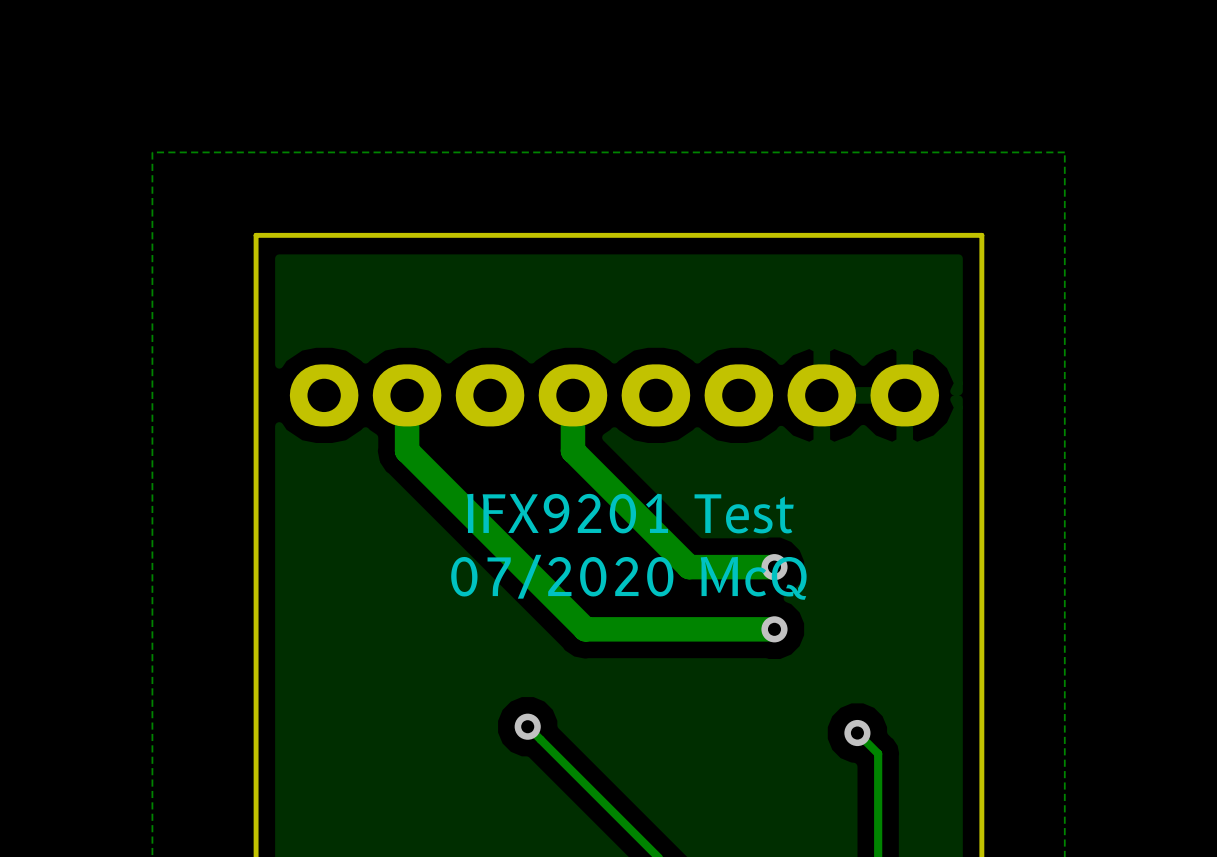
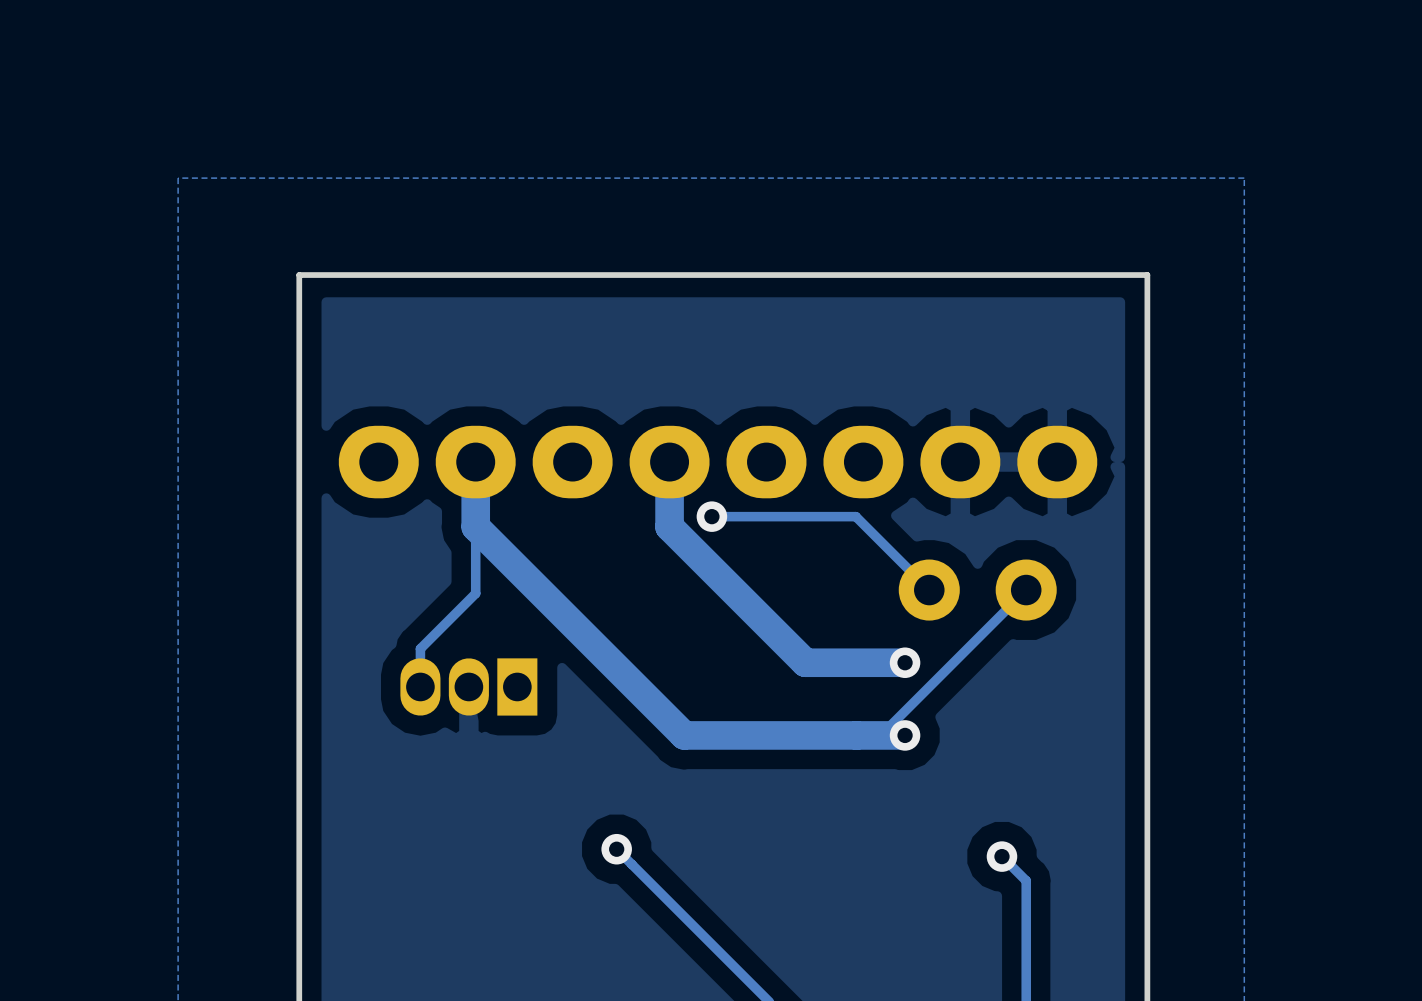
track: none -> (711, 516) (855, 516) (929, 590)
via: none -> (711, 516)
track: none -> (475, 526) (475, 593) (420, 648) (420, 686)
part: none -> (977, 590)
track: none -> (1026, 590) (880, 735) (856, 735)
text: IFX9201 Test (630, 513) -> none
text: 07/2020 McQ (628, 577) -> none
part: none -> (468, 686)

